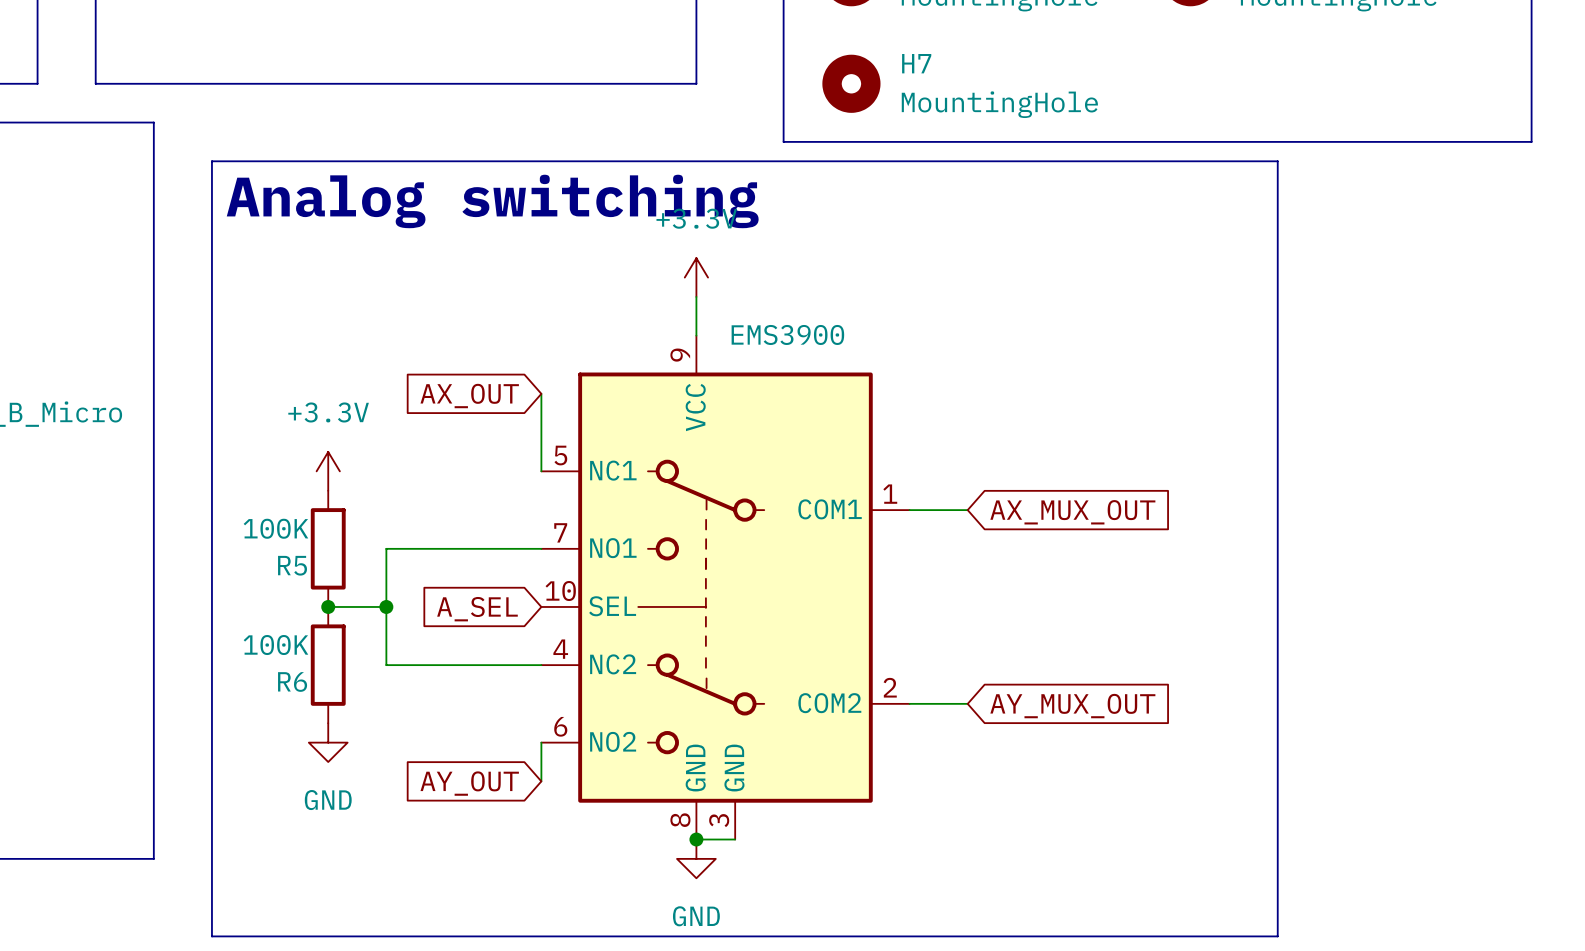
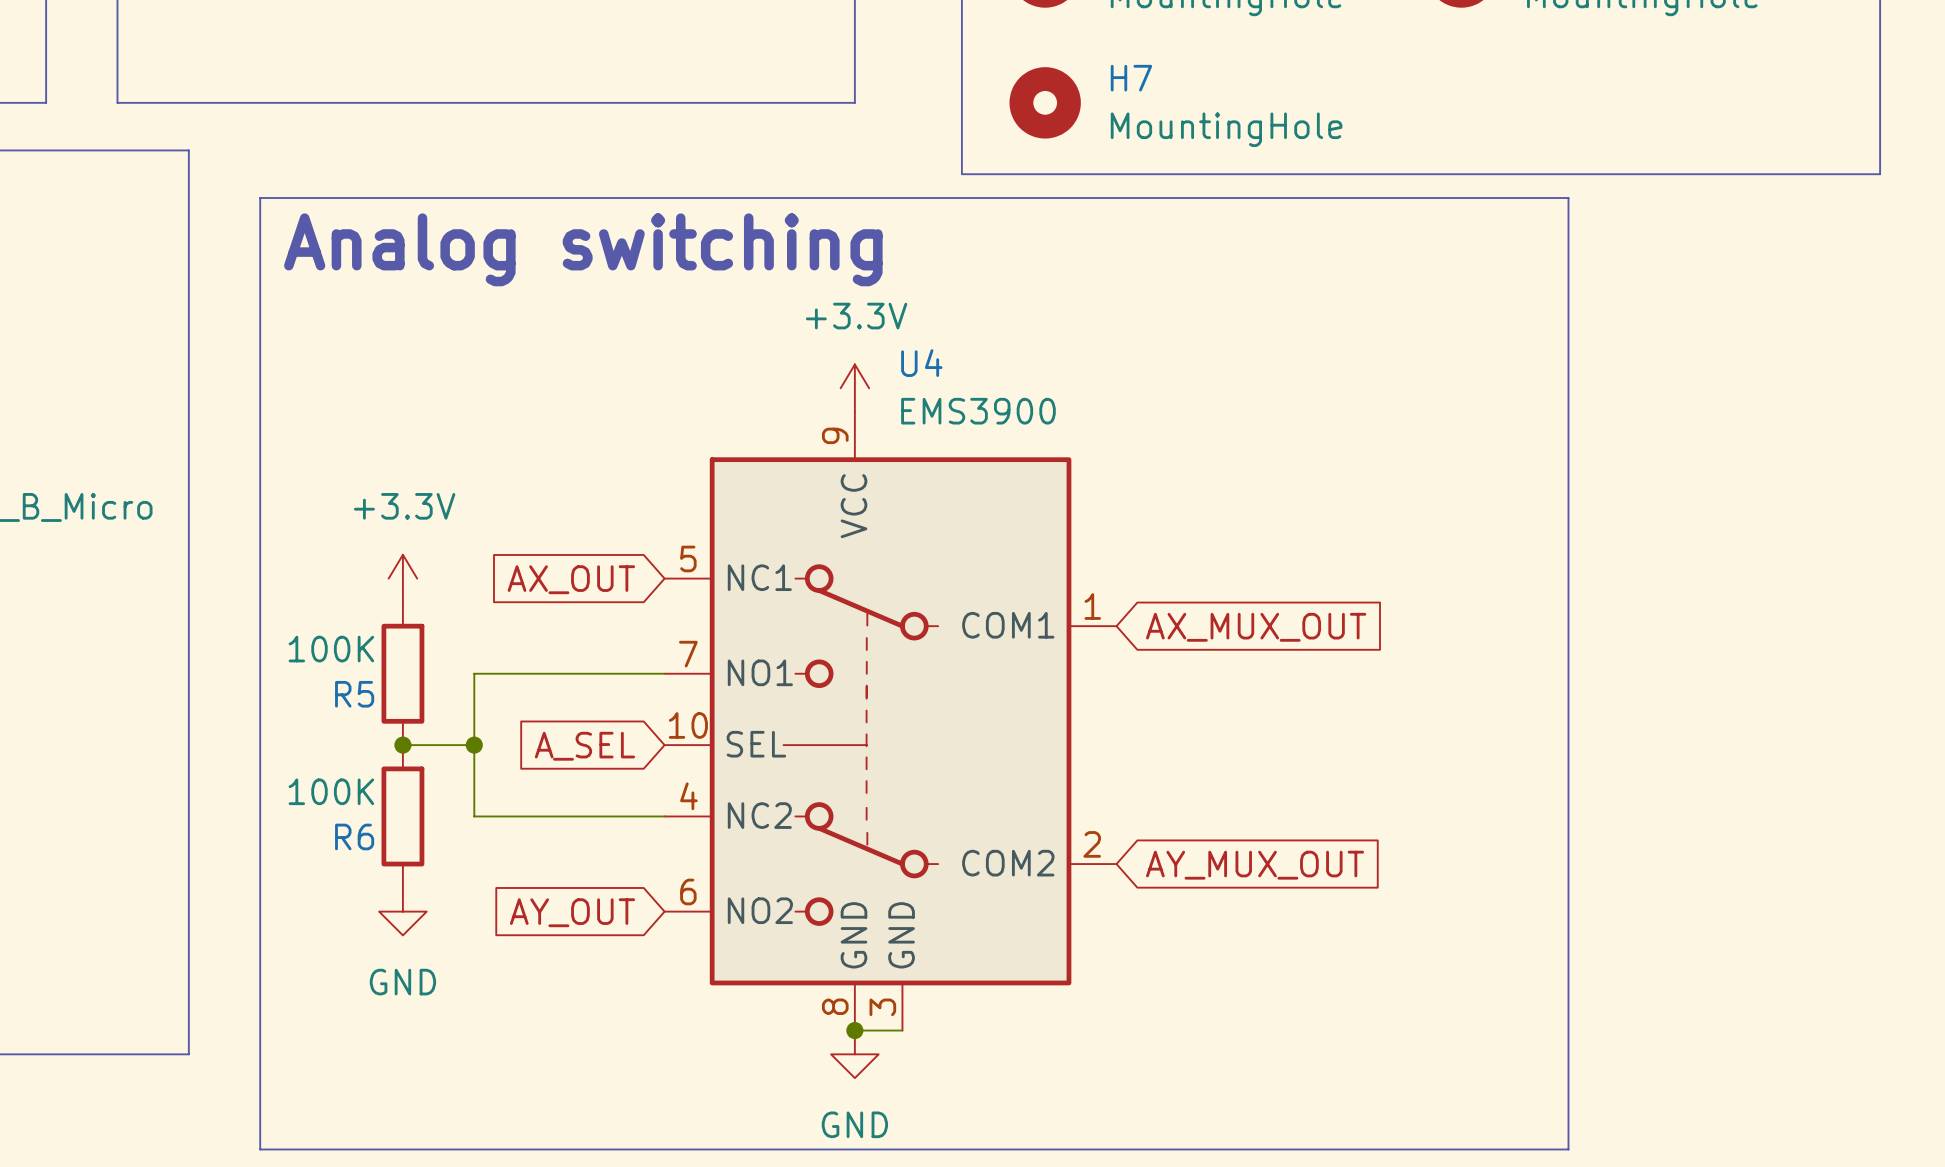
power symbol position: +3.3V (696, 277) -> +3.3V (854, 388)
U4 name: none -> U4 (921, 363)
wire: (541, 393) (541, 471) -> none
global label position: AX_OUT (469, 396) -> AX_OUT (571, 579)
wire: (909, 510) (967, 510) -> none
global label position: AX_MUX_OUT (1072, 512) -> AX_MUX_OUT (1256, 627)
wire: (909, 703) (967, 703) -> none
global label position: AY_MUX_OUT (1072, 706) -> AY_MUX_OUT (1255, 865)
wire: (541, 742) (541, 781) -> none
global label position: AY_OUT (469, 783) -> AY_OUT (572, 912)

